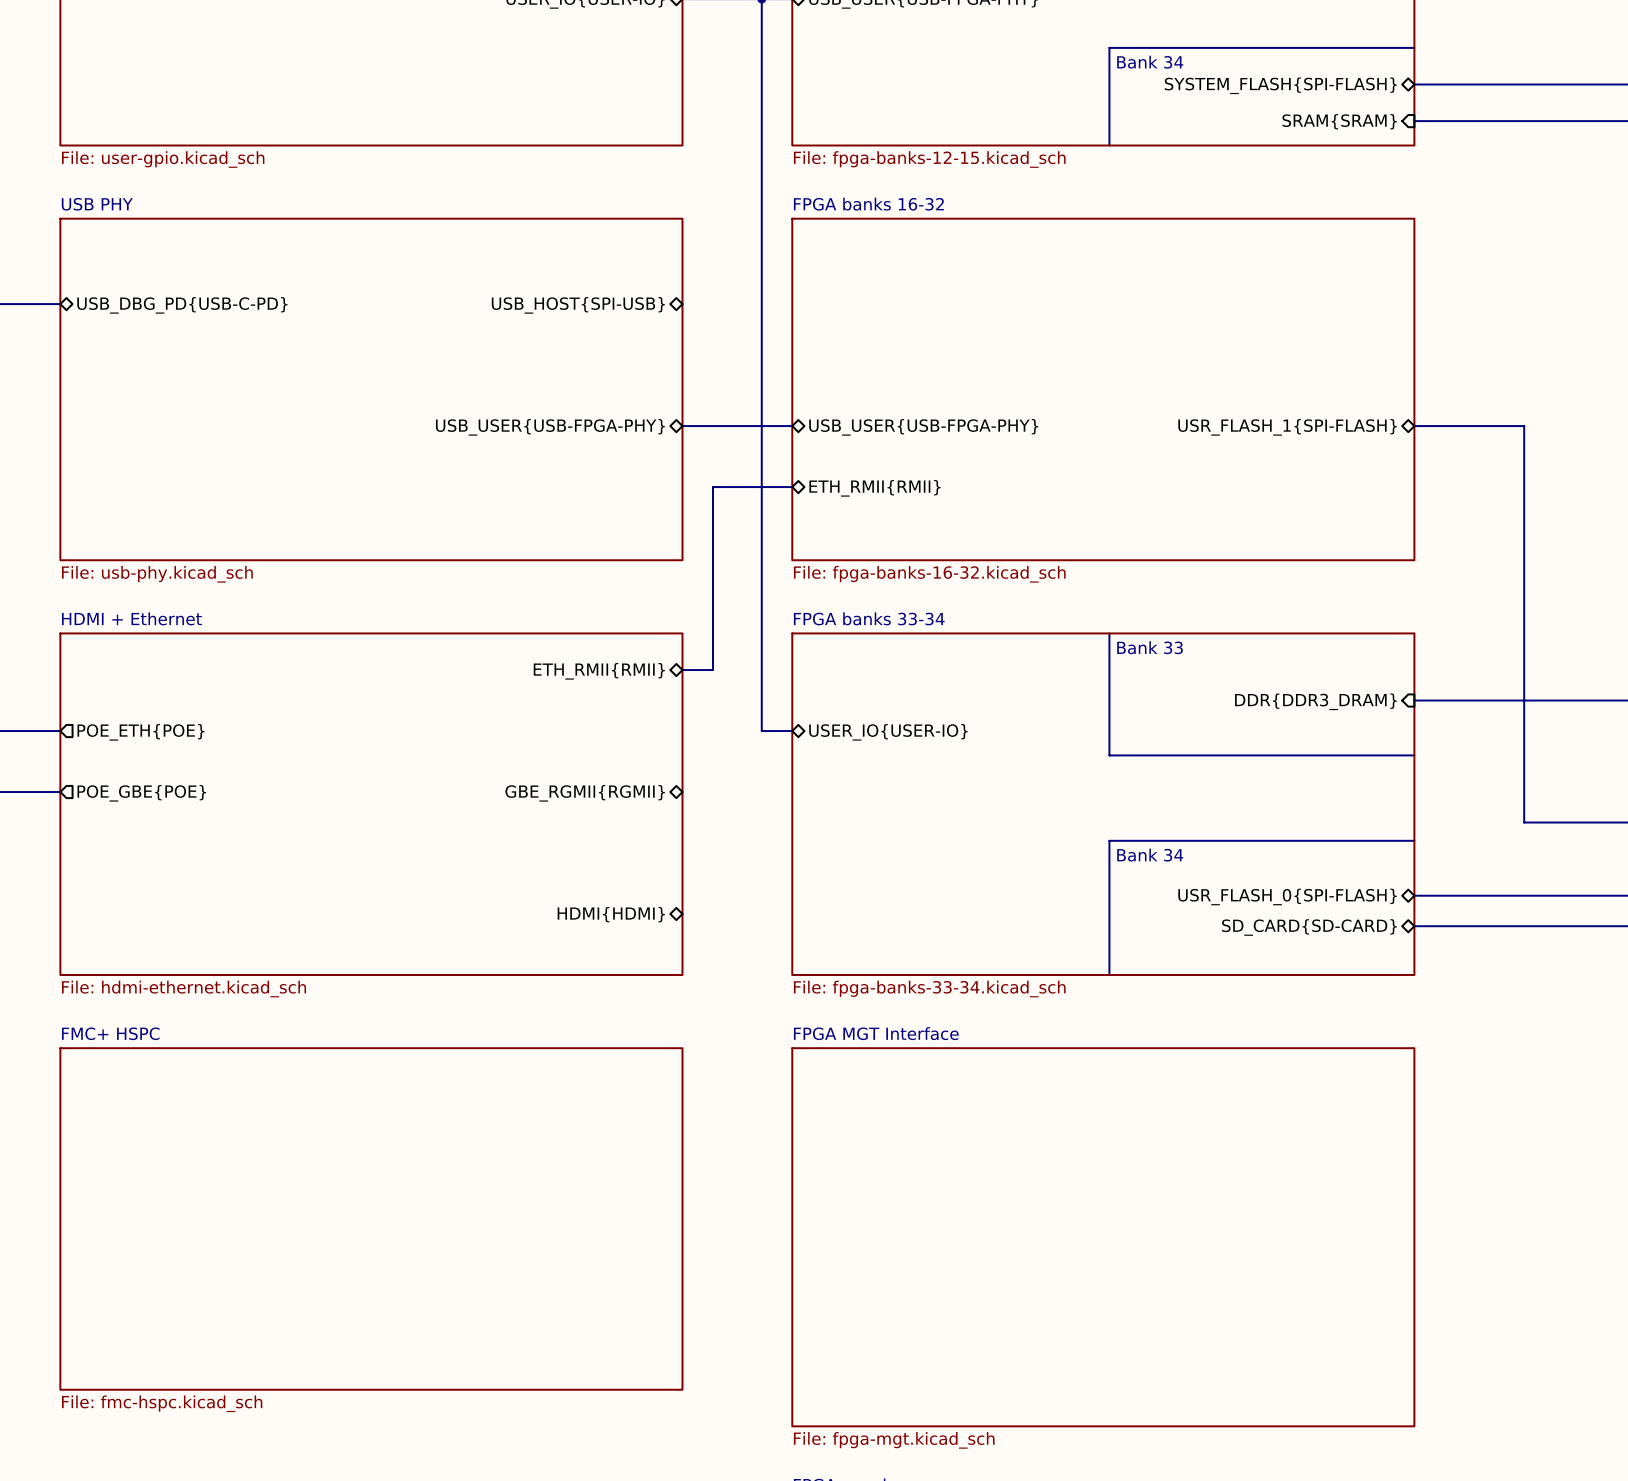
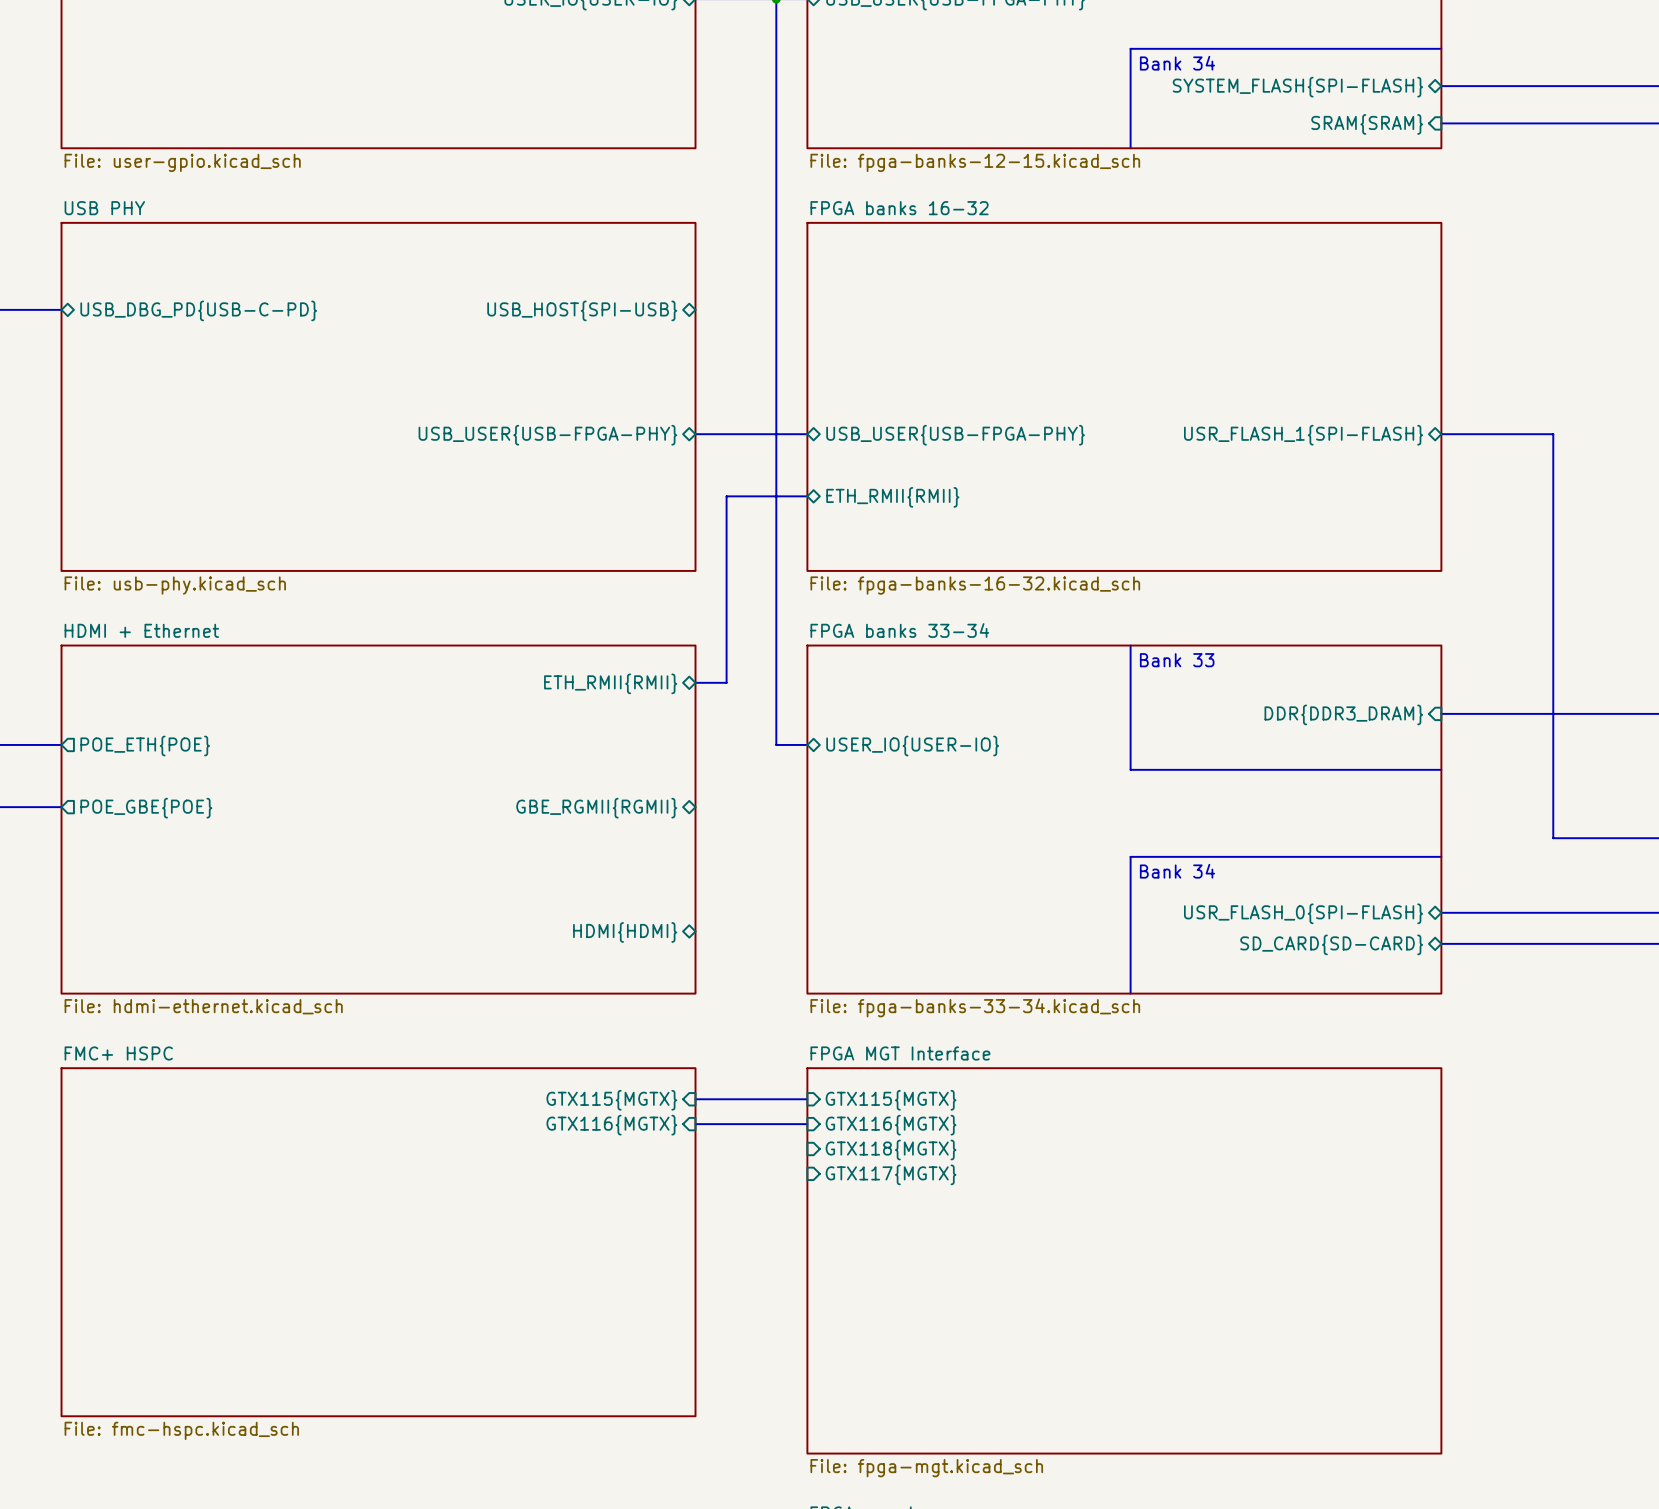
bus: none -> (695, 1099) (807, 1099)
sheet pin: none -> GTX115{MGTX} (611, 1100)
sheet pin: none -> GTX115{MGTX} (891, 1100)
sheet pin: none -> GTX116{MGTX} (611, 1125)
bus: none -> (695, 1124) (807, 1124)
sheet pin: none -> GTX116{MGTX} (891, 1125)
sheet pin: none -> GTX118{MGTX} (891, 1150)
sheet pin: none -> GTX117{MGTX} (891, 1174)

